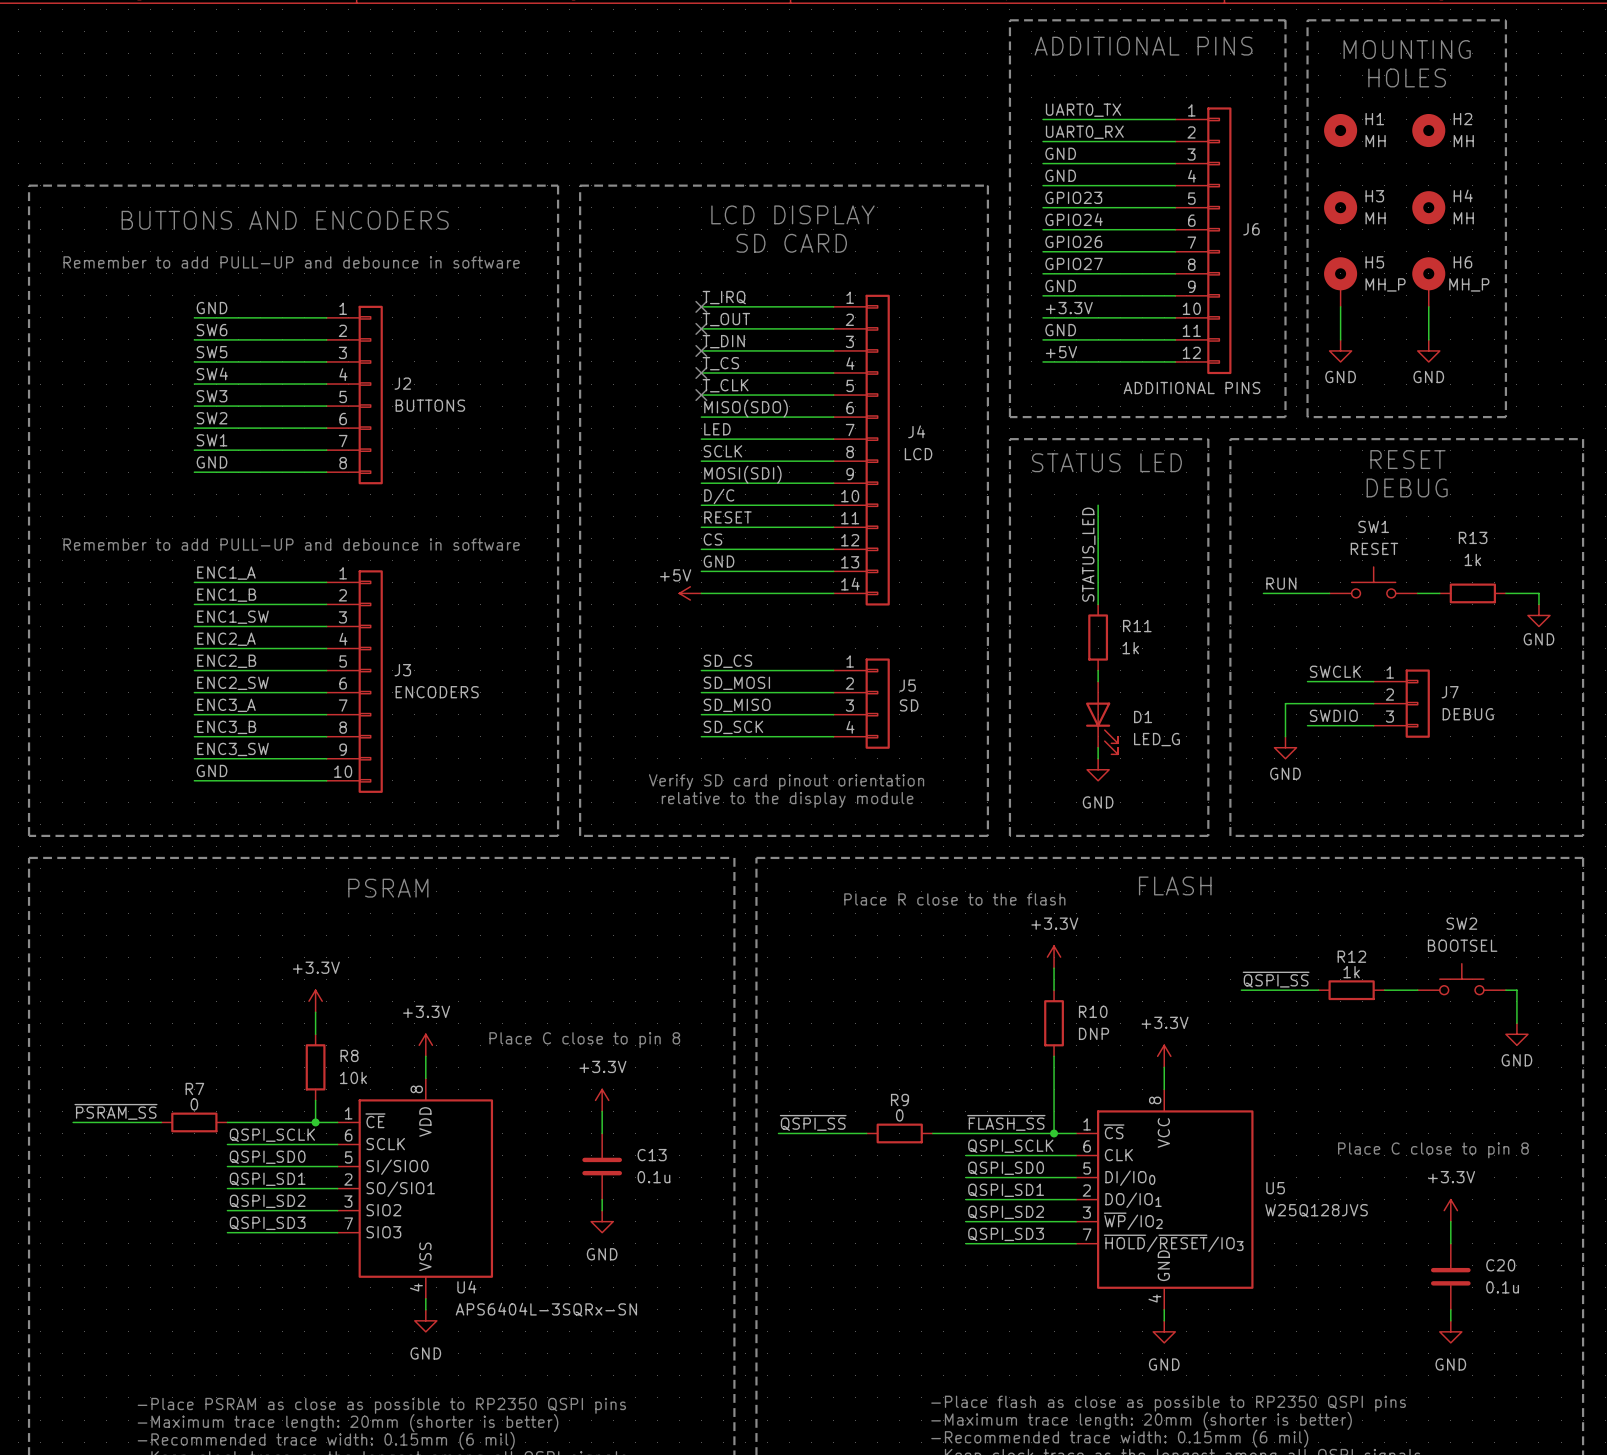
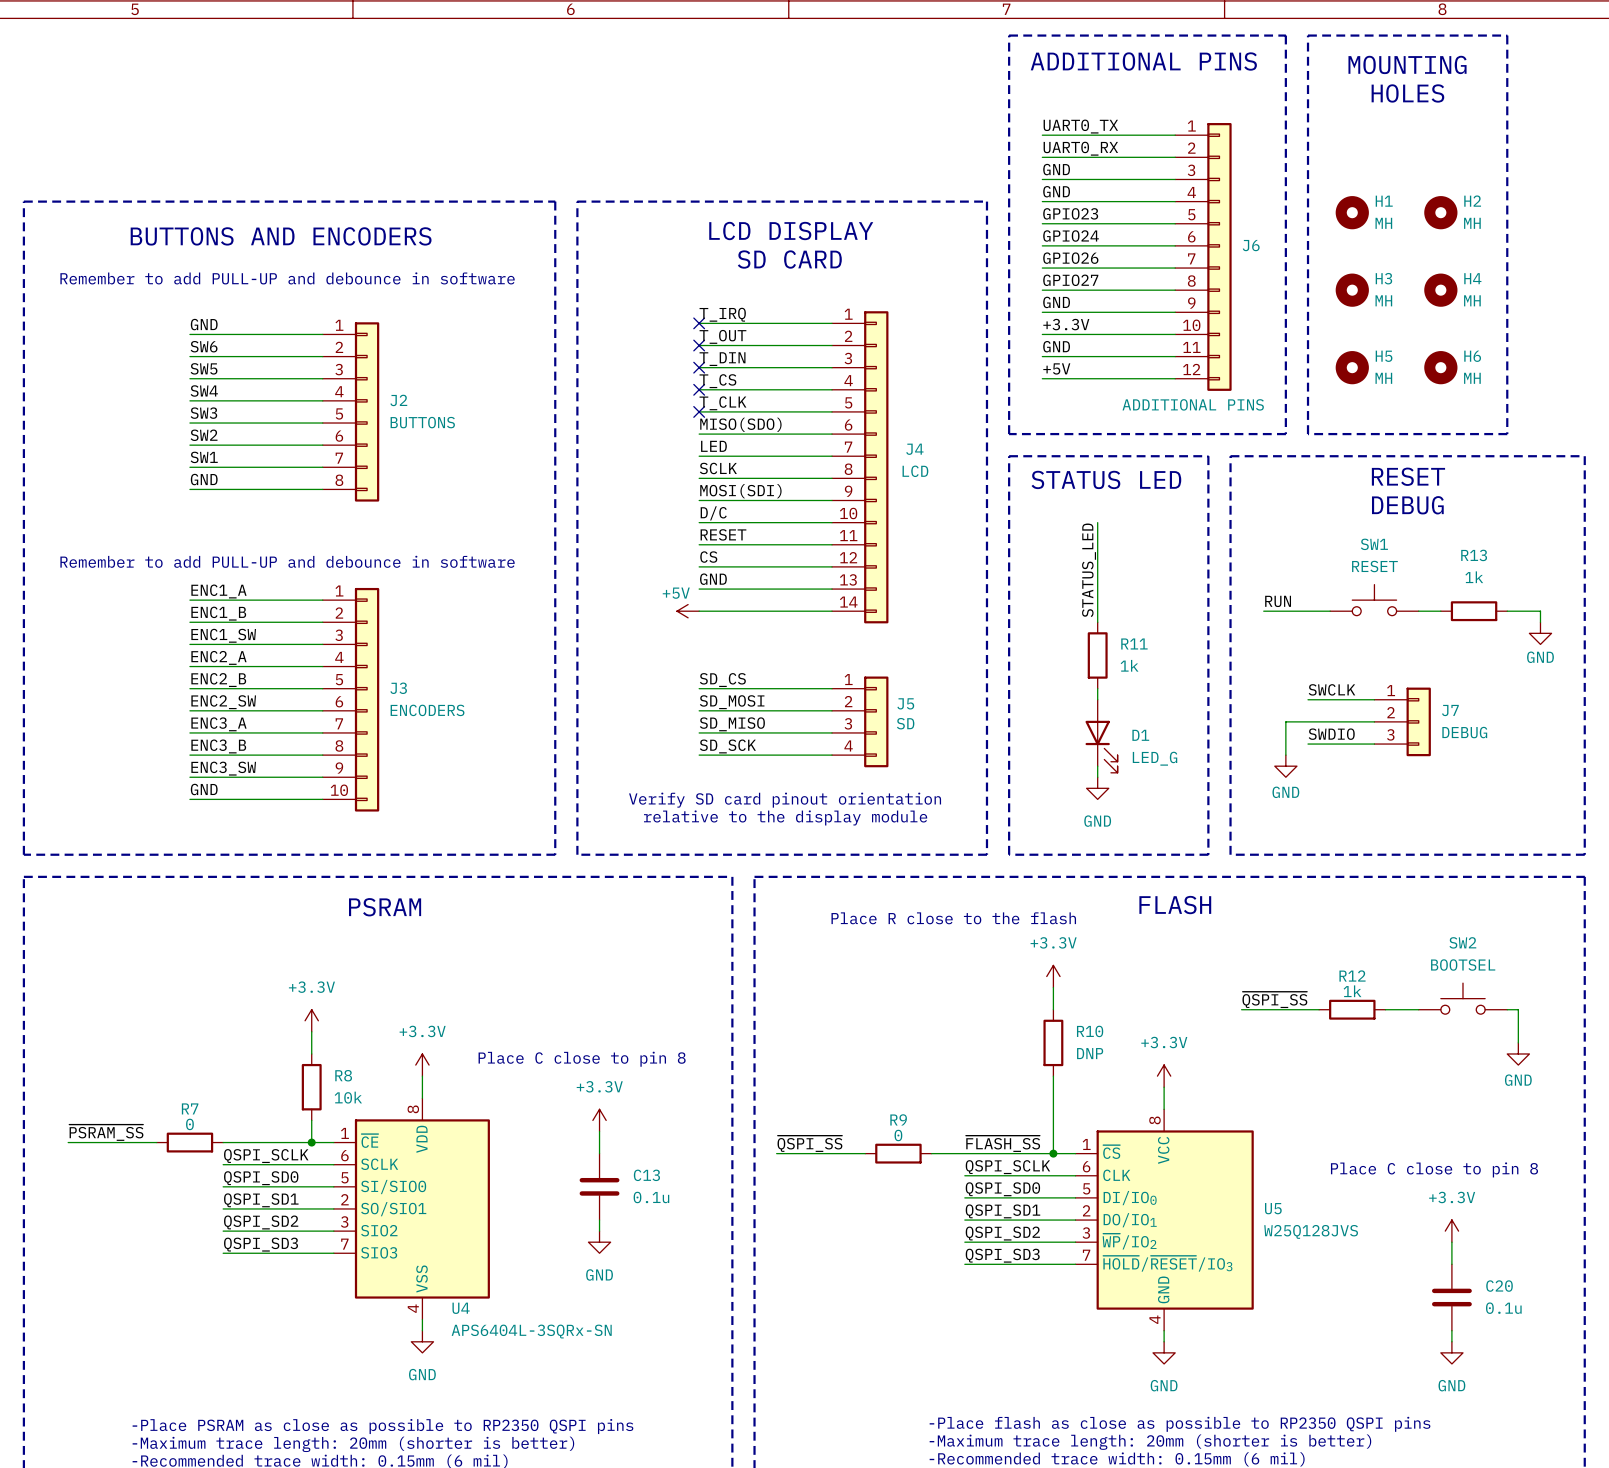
H1 position: (1340, 130) -> (1352, 212)
H2 position: (1428, 130) -> (1440, 212)
H3 position: (1340, 207) -> (1352, 290)
H4 position: (1428, 207) -> (1440, 290)
H5 symbol: [1324, 257, 1358, 307] -> [1335, 351, 1369, 385]
H6 symbol: [1412, 257, 1446, 307] -> [1424, 351, 1458, 385]
H5 value: MH_P (1385, 284) -> MH (1383, 378)
H6 value: MH_P (1469, 284) -> MH (1472, 378)
wire: (1340, 306) (1340, 339) -> none
wire: (1428, 306) (1428, 339) -> none
power symbol: GND (1340, 350) -> none
power symbol: GND (1428, 350) -> none

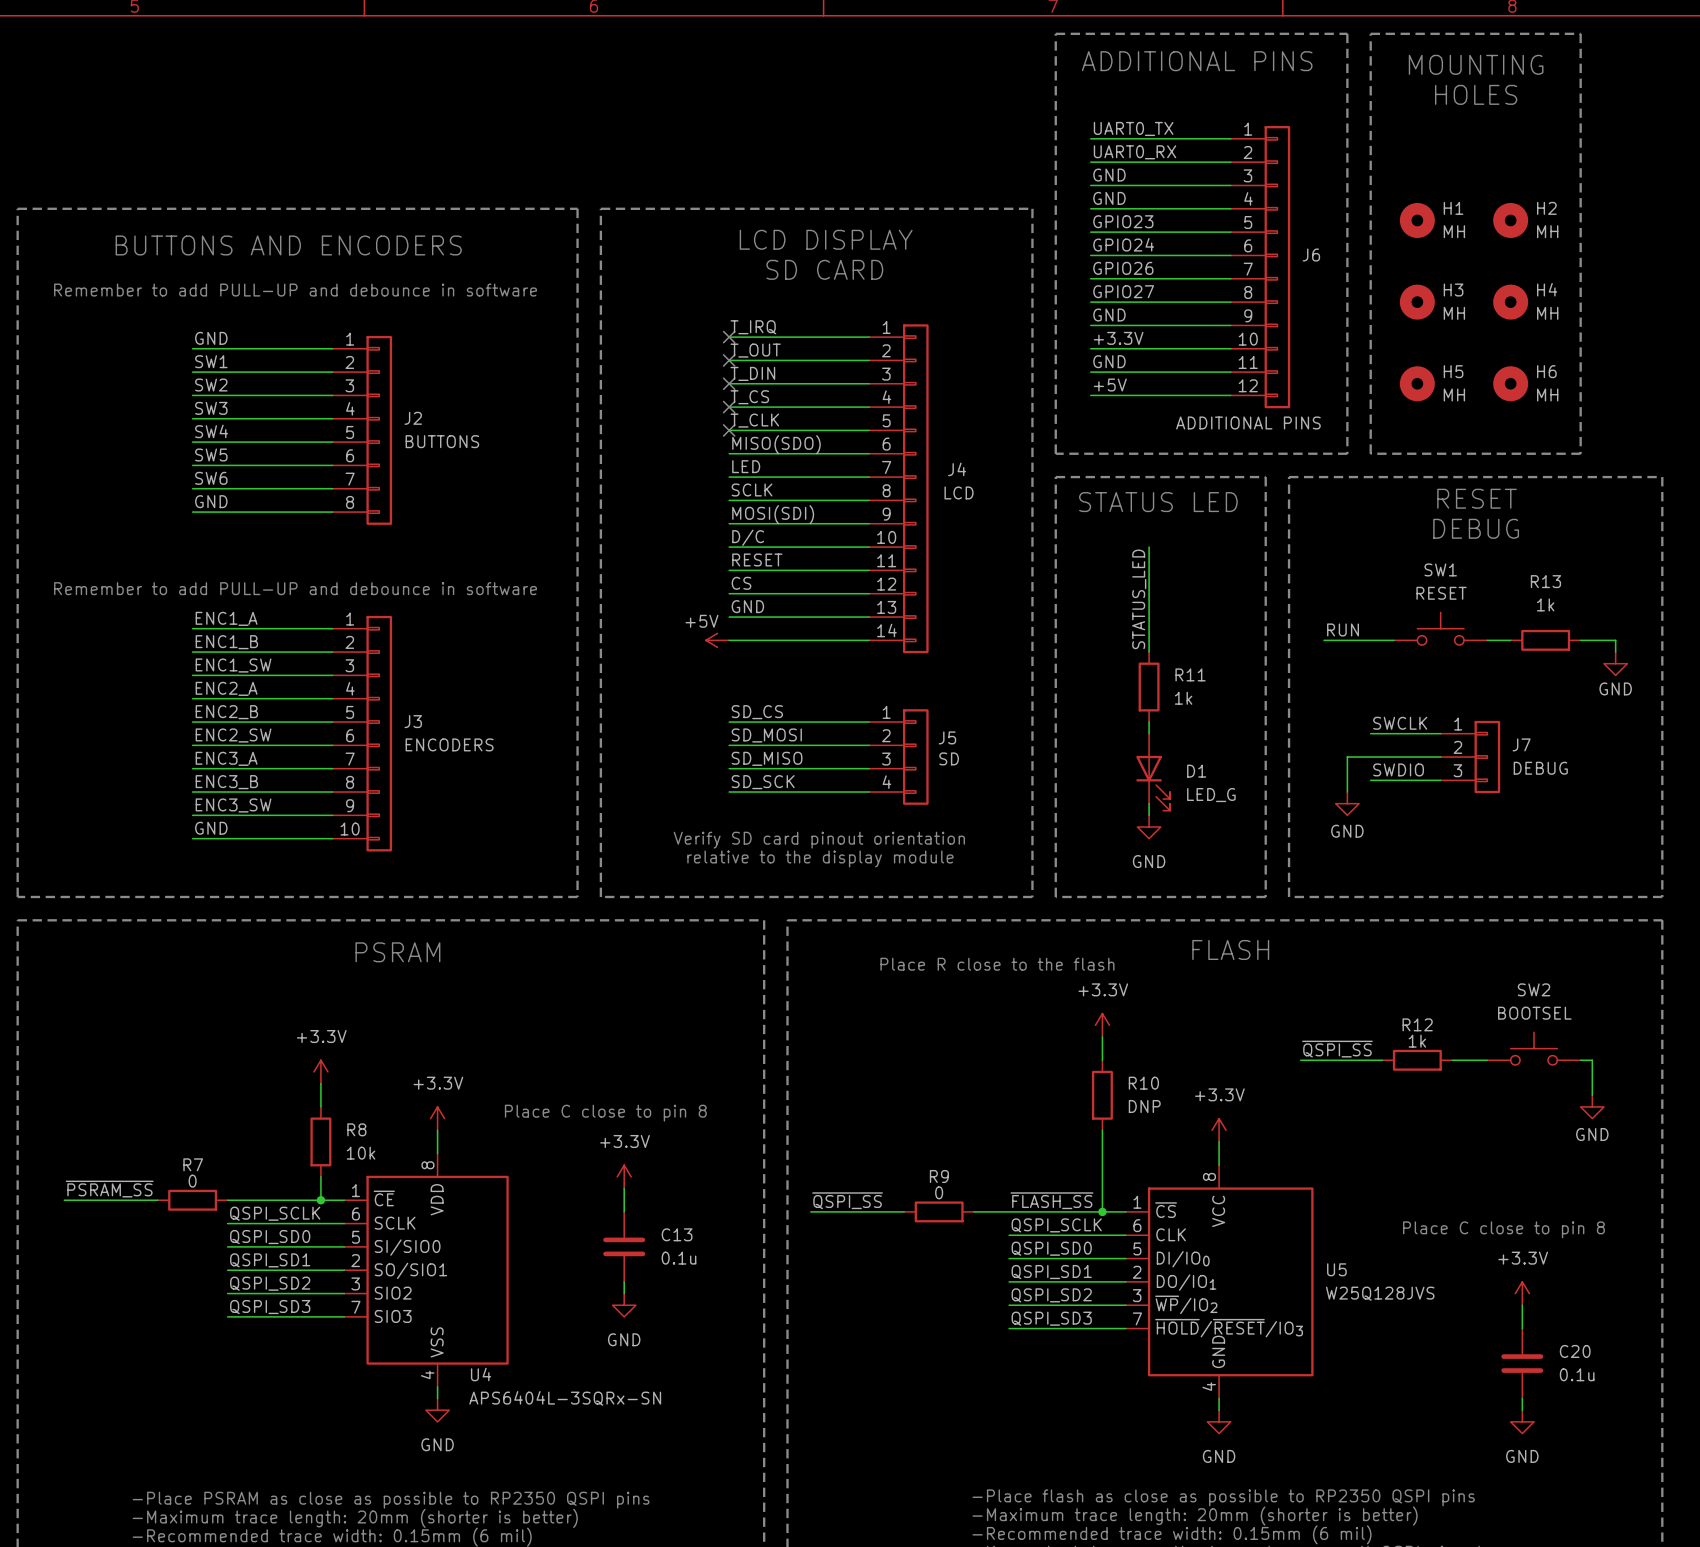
label: SW6 (204, 346) -> SW1 (211, 361)
label: SW5 (204, 368) -> SW2 (211, 385)
label: SW4 (204, 390) -> SW3 (211, 408)
label: SW3 (203, 413) -> SW4 (211, 431)
label: SW2 (204, 435) -> SW5 (211, 455)
label: SW1 (204, 457) -> SW6 (211, 478)

